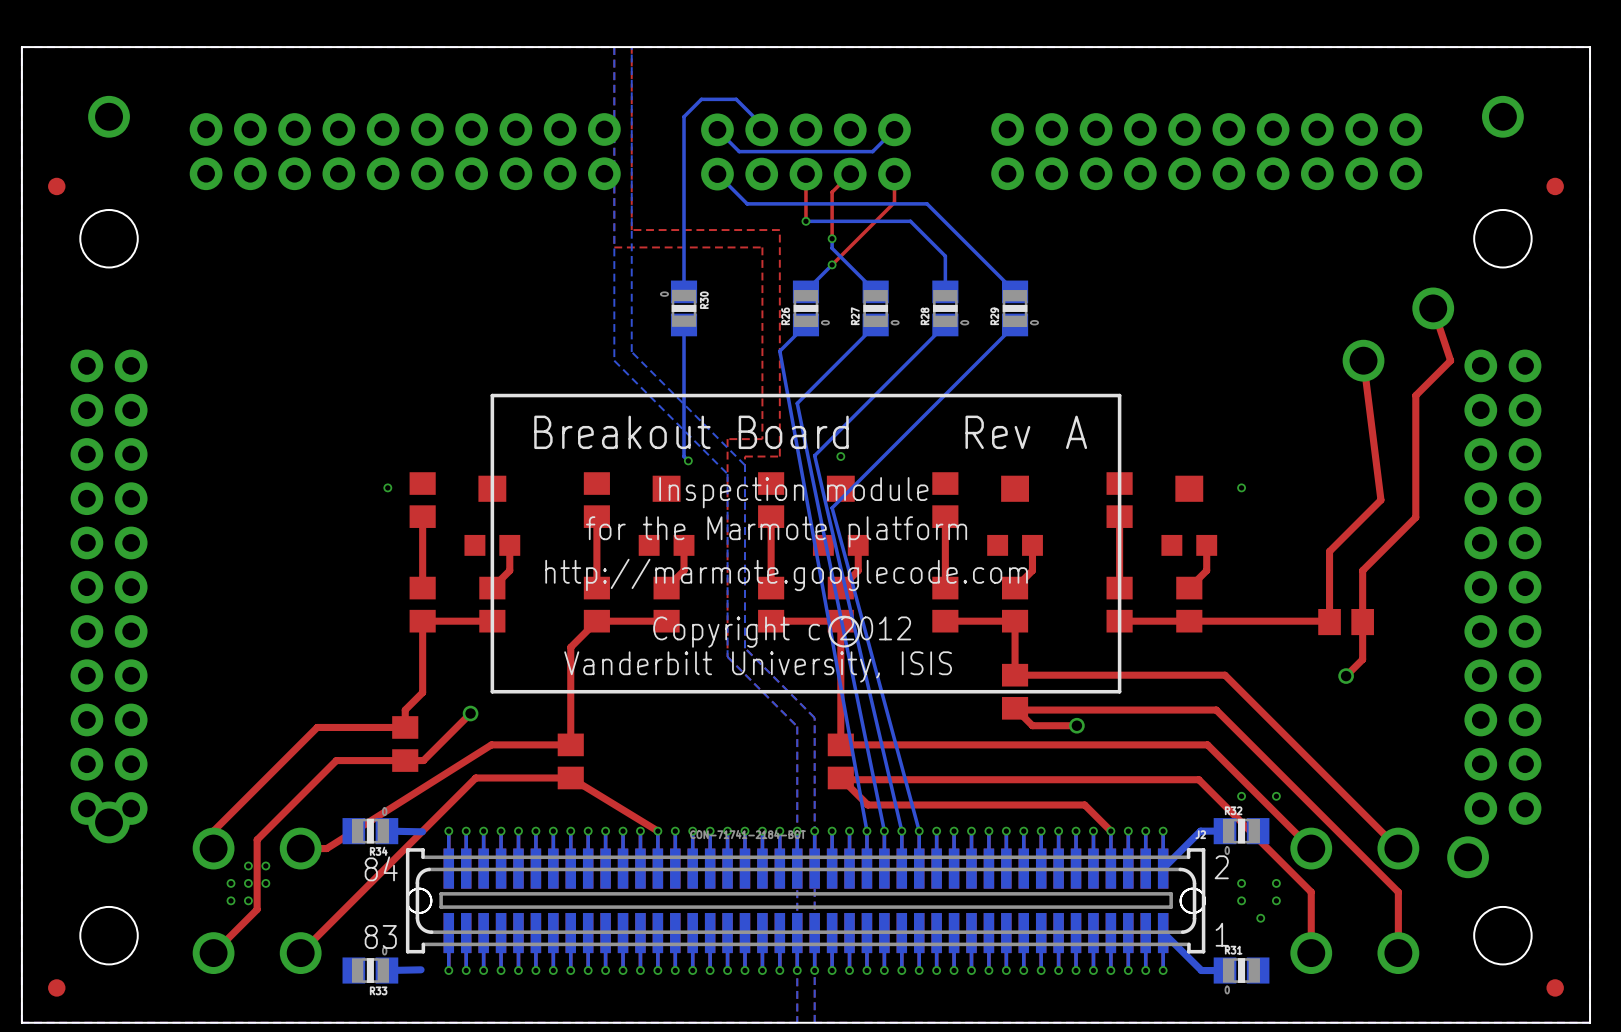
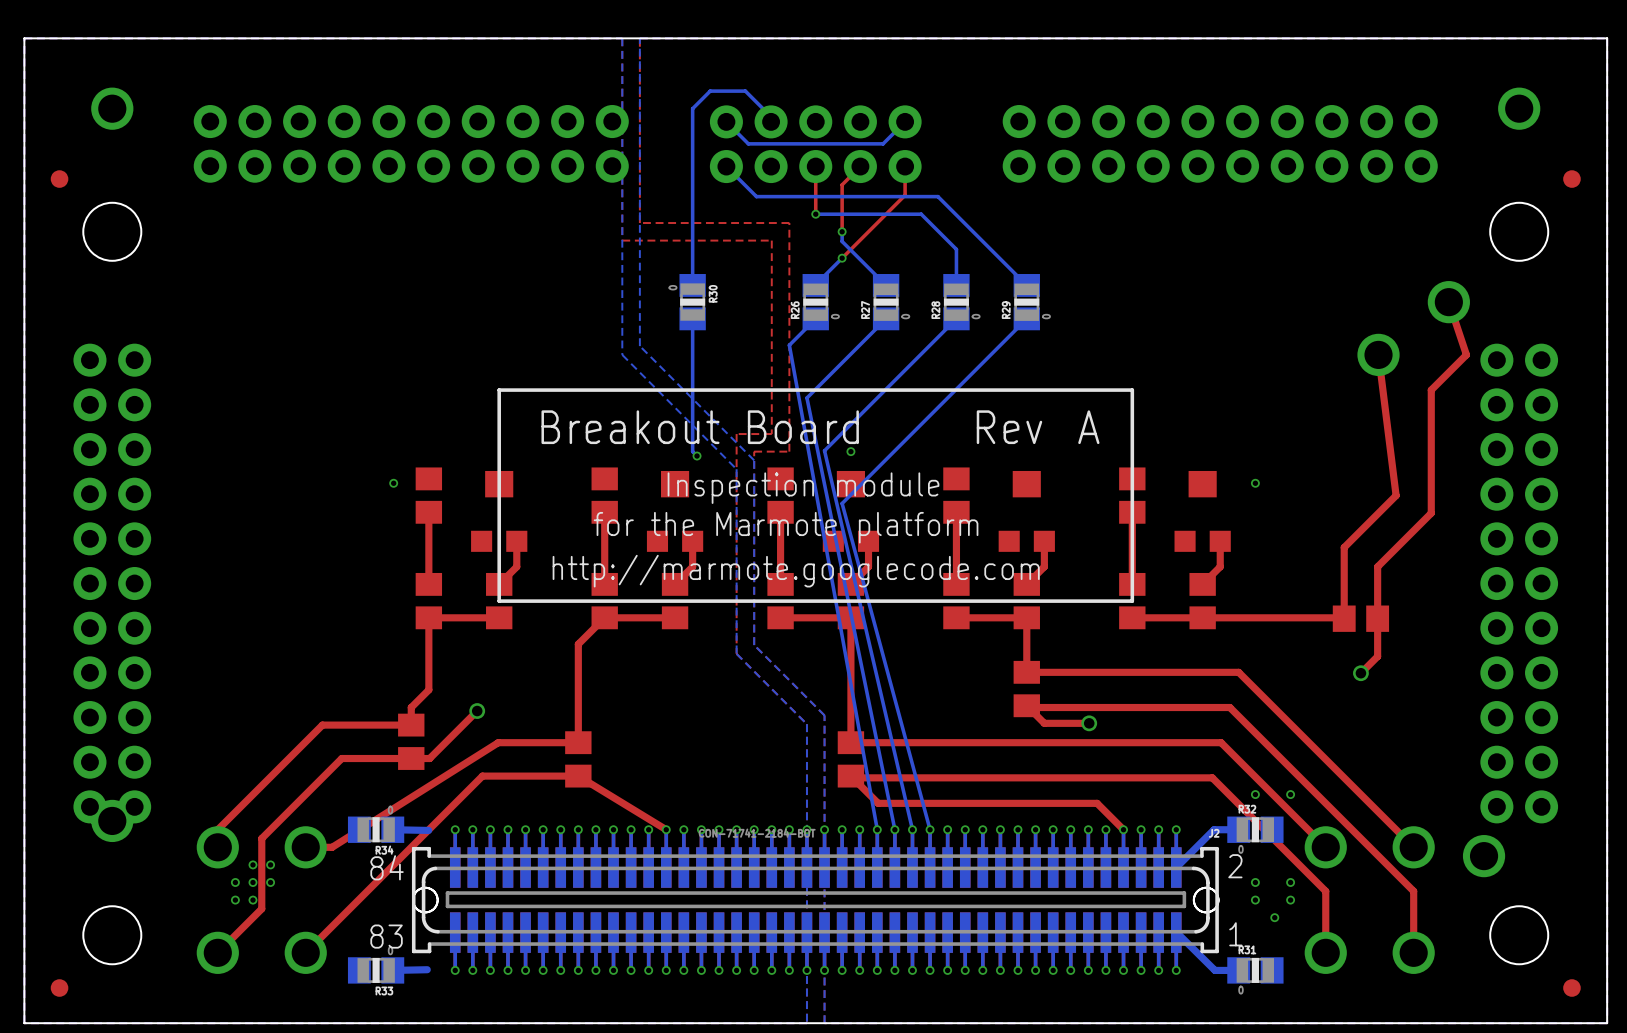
line: (1119, 604) (1119, 691) (492, 691) (492, 604) -> (1132, 601) (499, 601)
drawing: [828, 615, 861, 648] -> none
text: Copyright c 2012 (782, 632) -> none
text: Vanderbilt University, ISIS (758, 666) -> none

